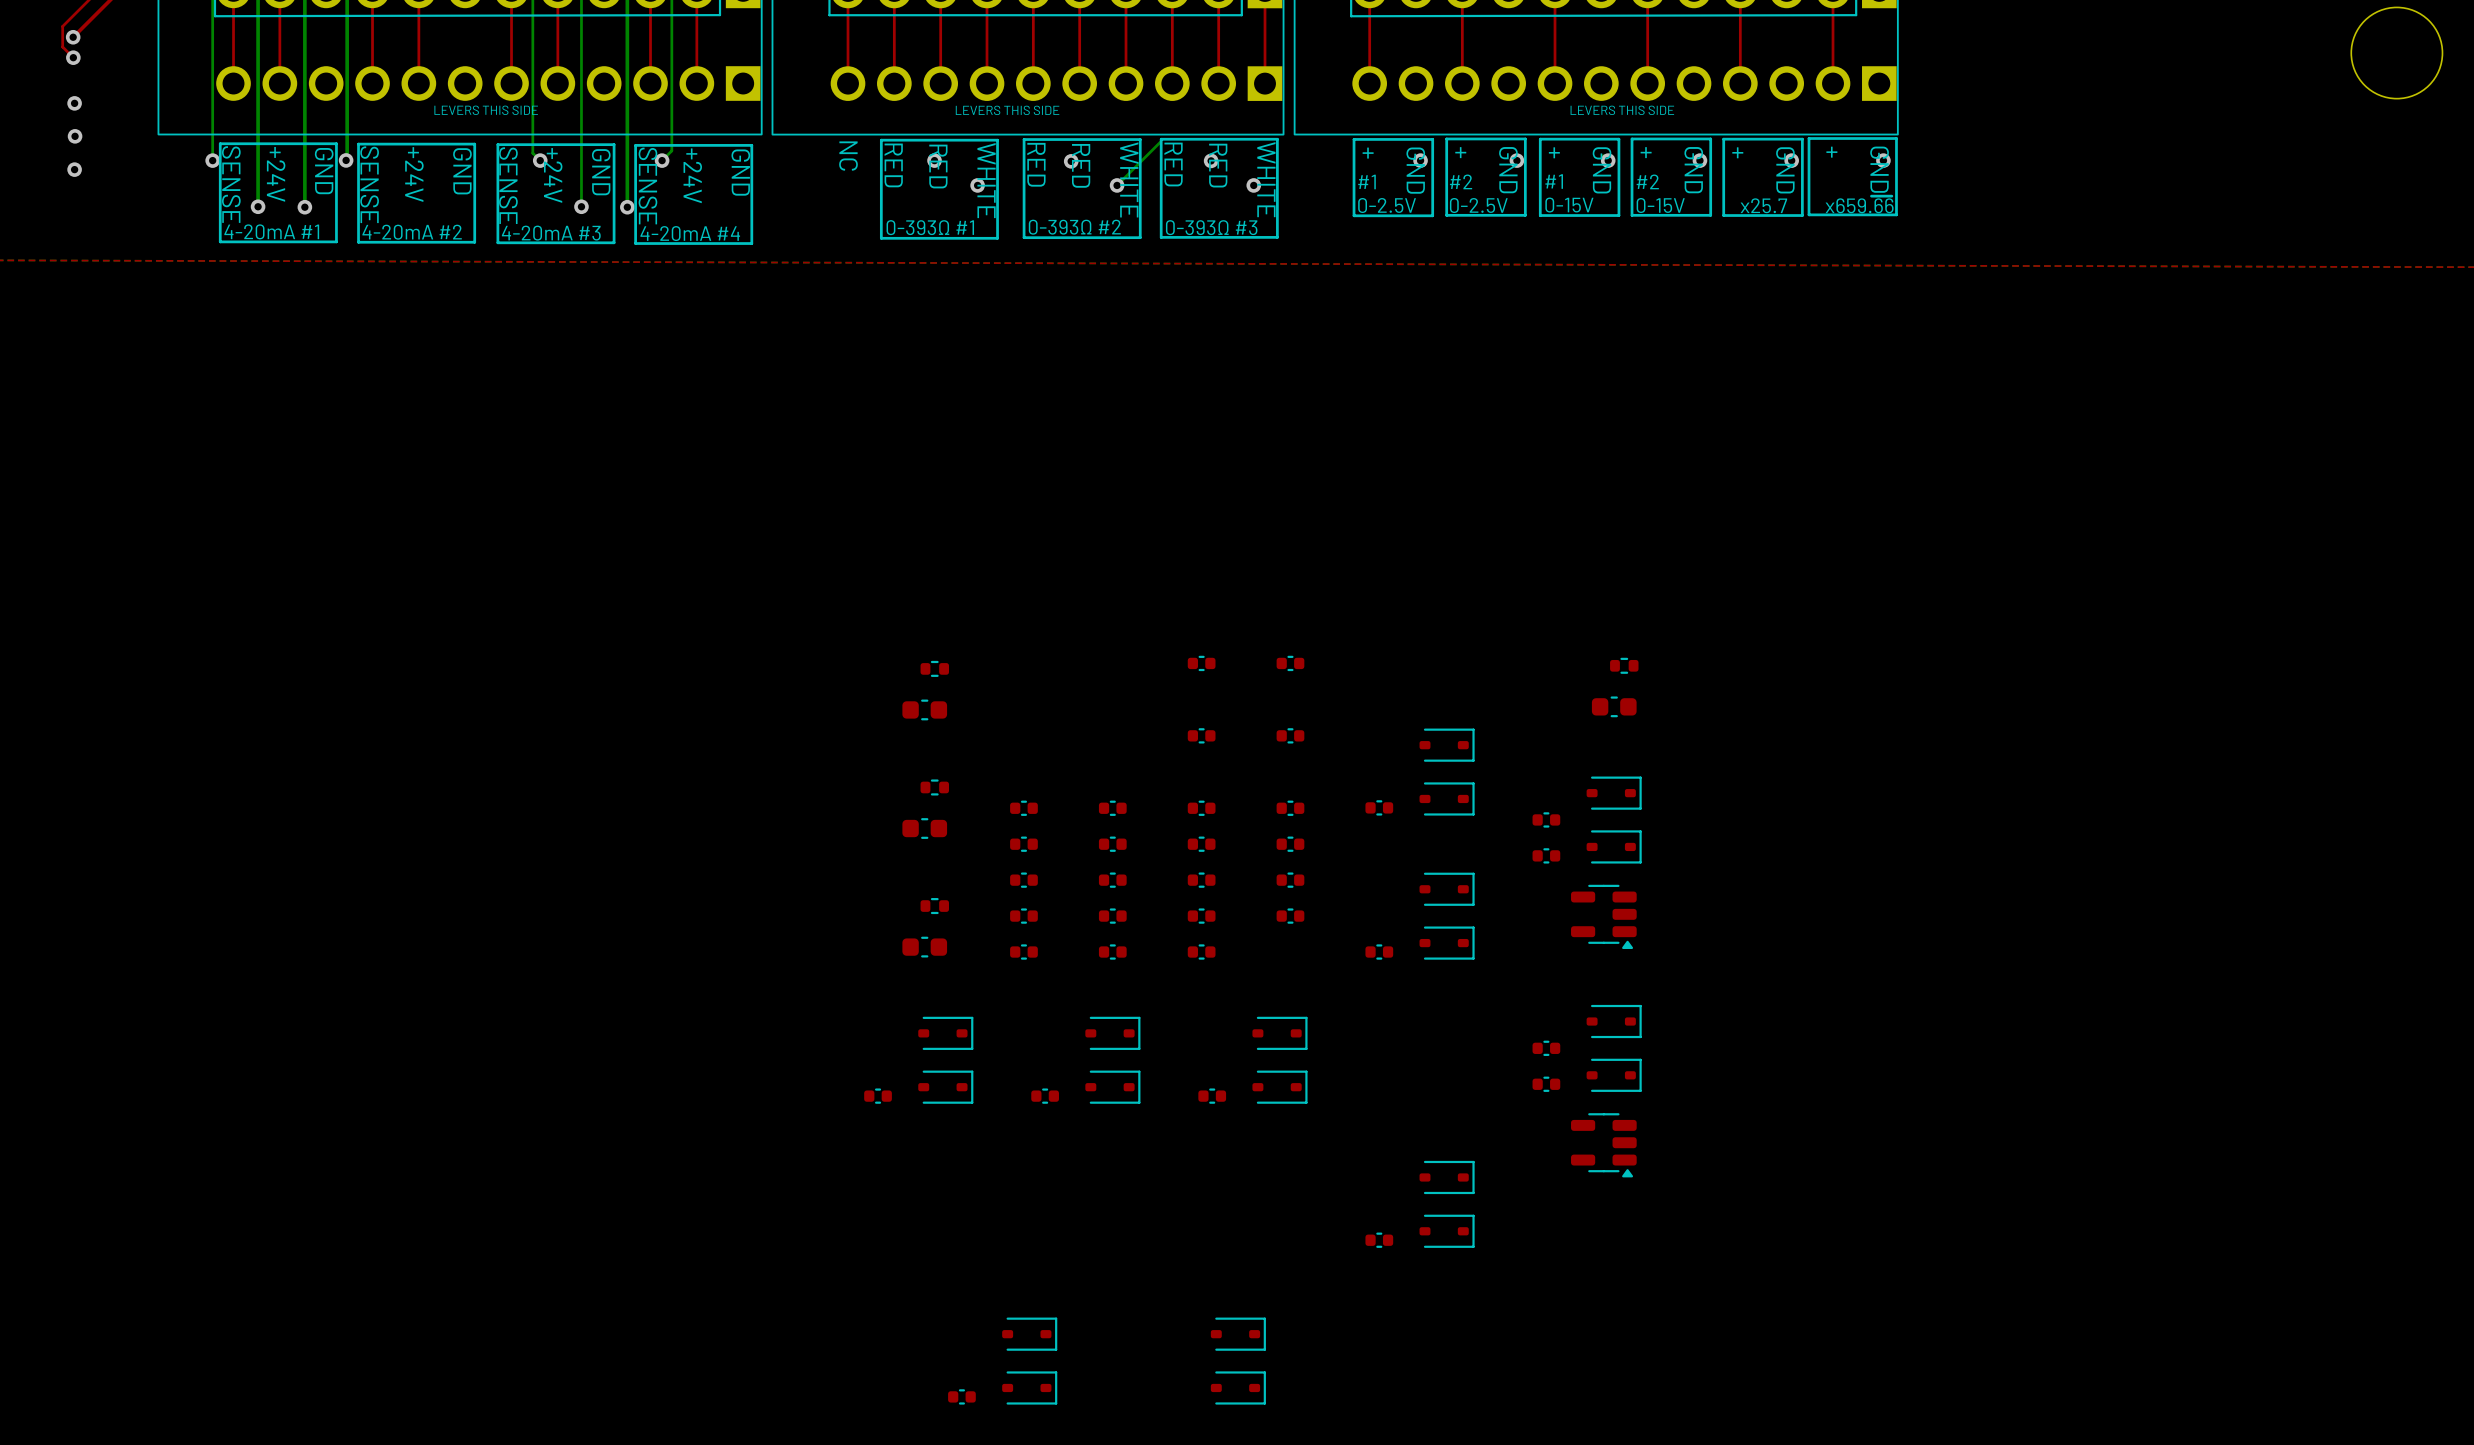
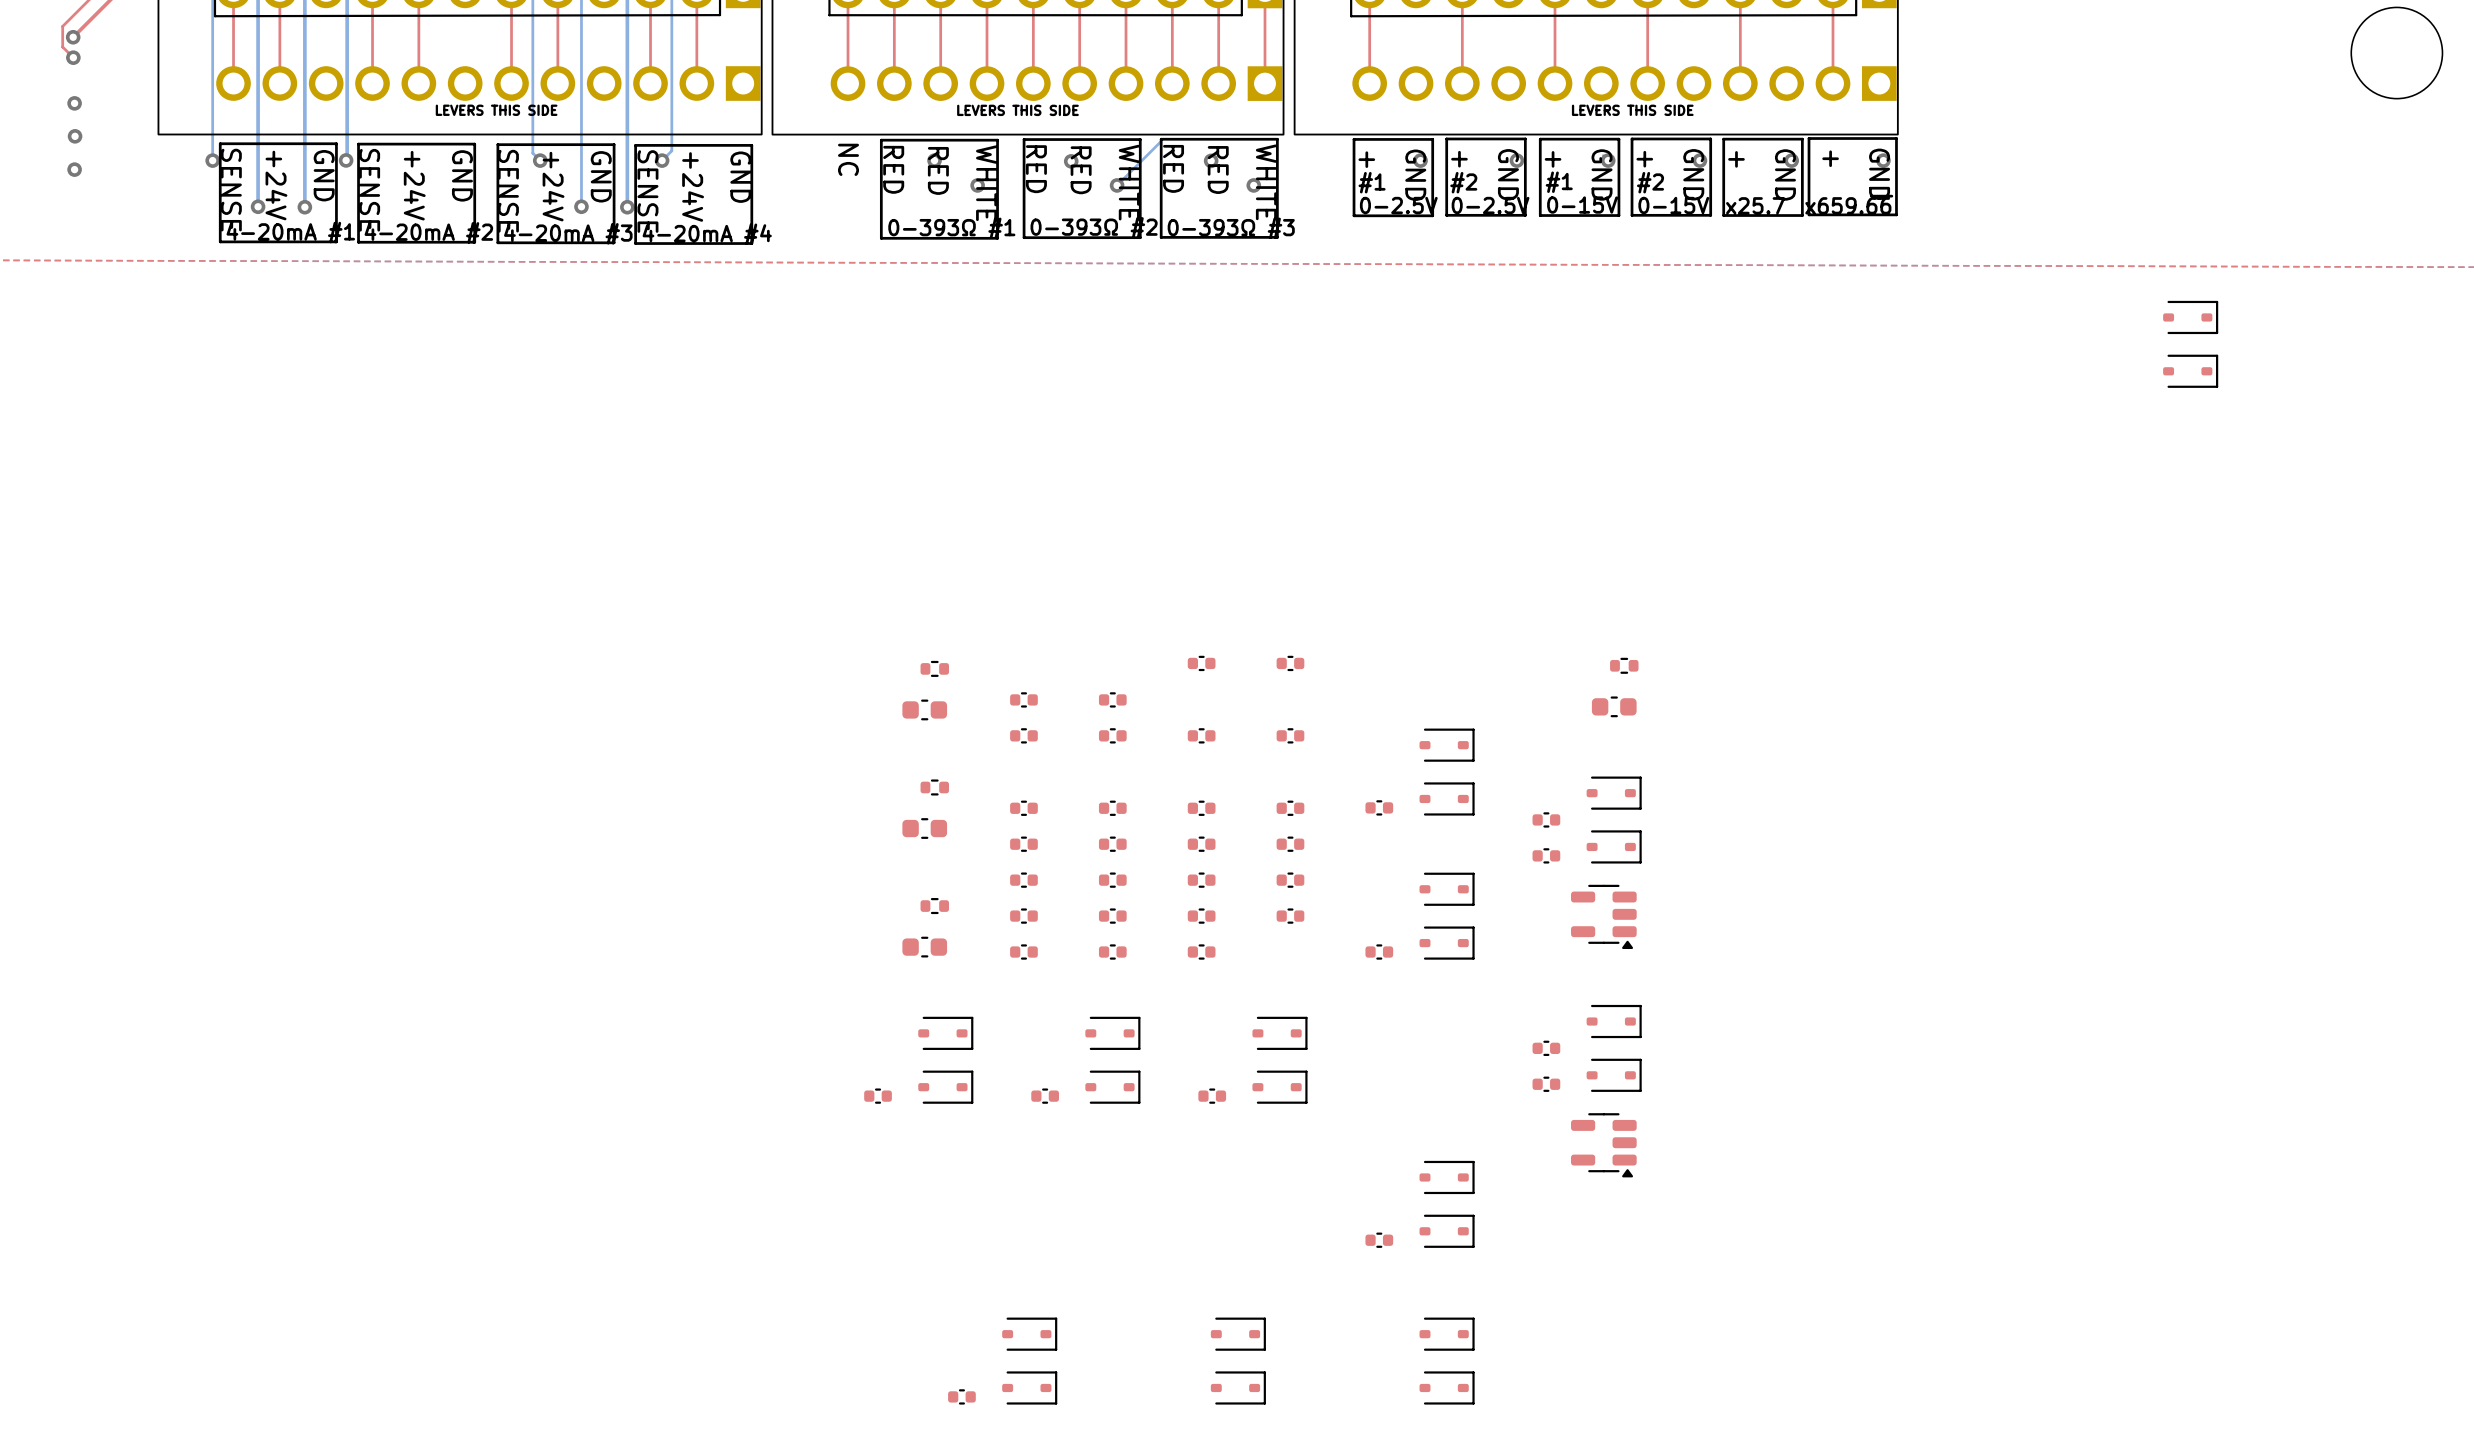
part: none -> (2190, 317)
part: none -> (2190, 371)
part: none -> (1023, 699)
part: none -> (1112, 699)
part: none -> (1023, 735)
part: none -> (1112, 735)
part: none -> (1447, 1334)
part: none -> (1447, 1387)

